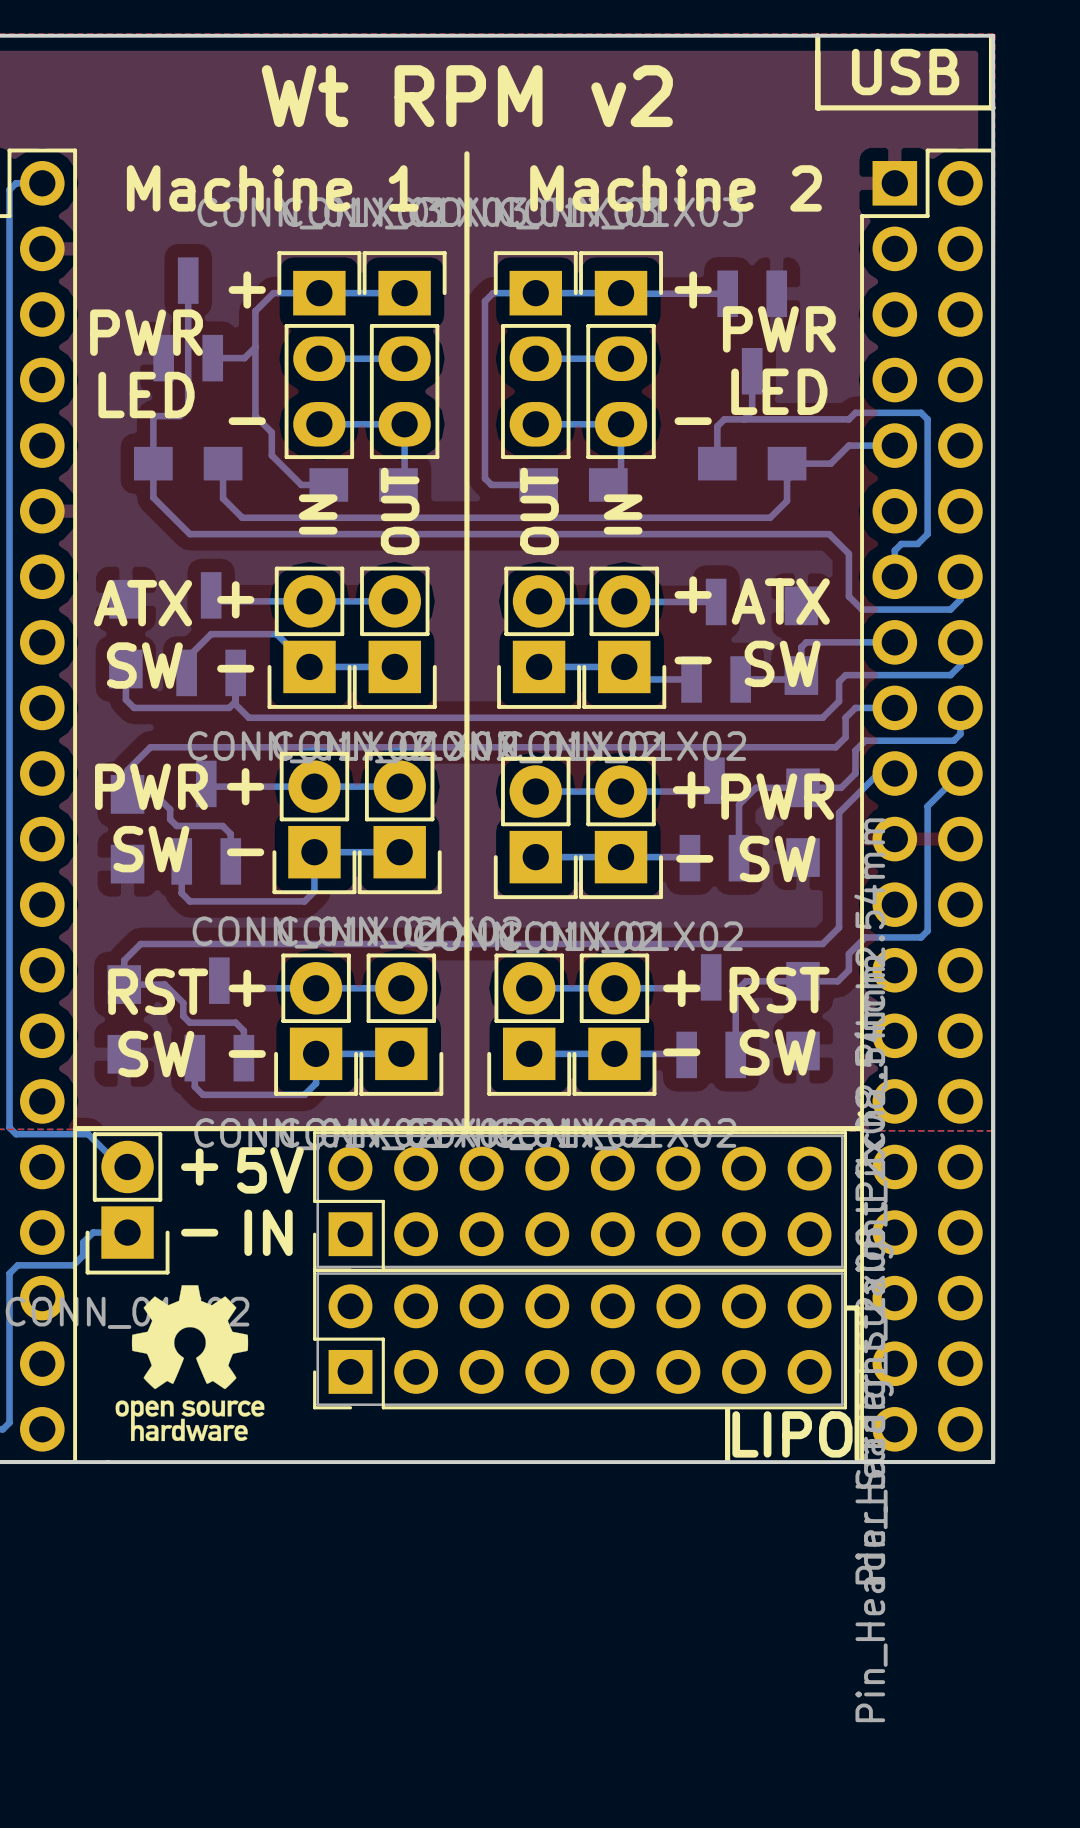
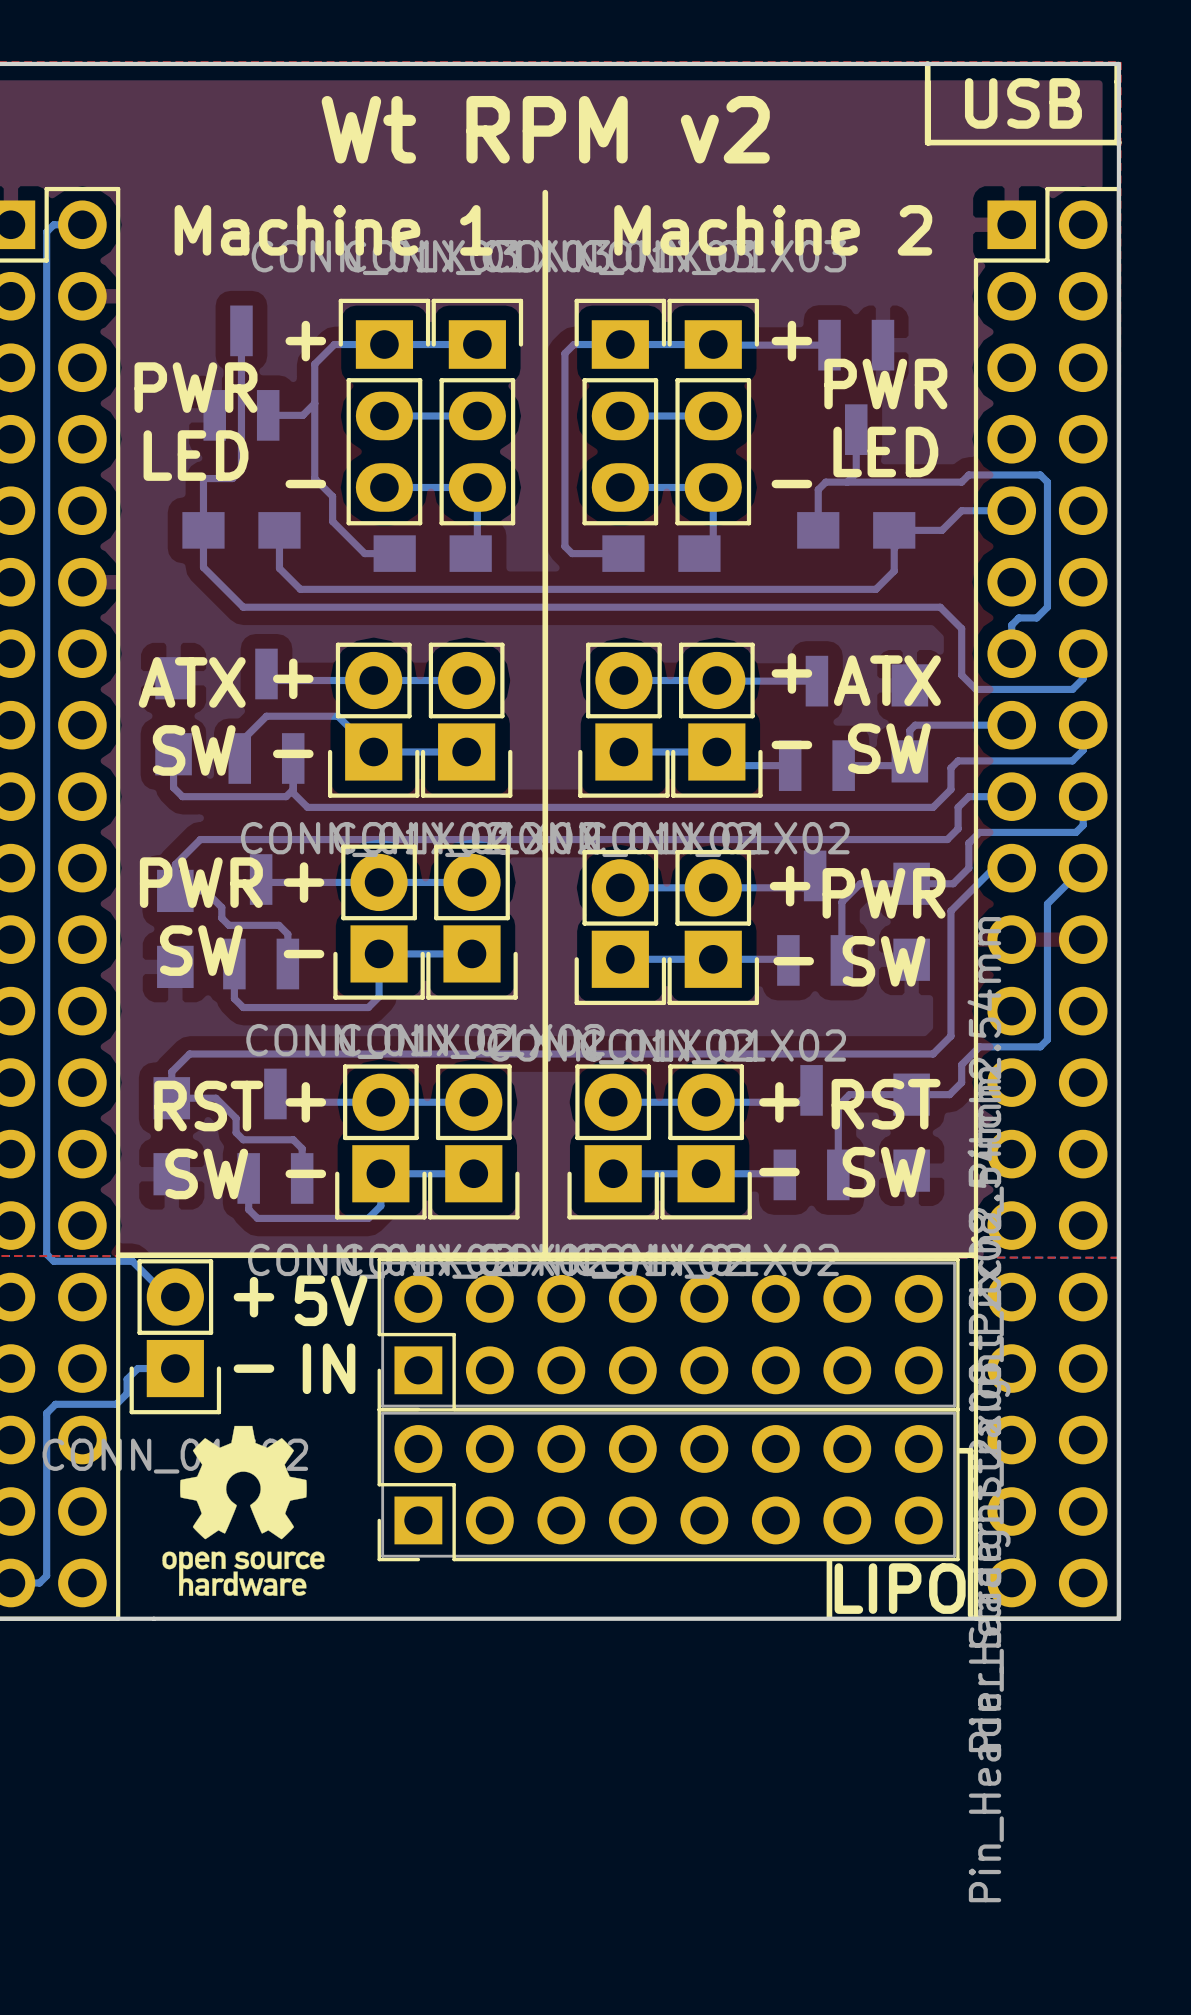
text: OUT (400, 511) -> none
text: OUT (539, 511) -> none
text: IN (318, 514) -> none
text: IN (623, 514) -> none

